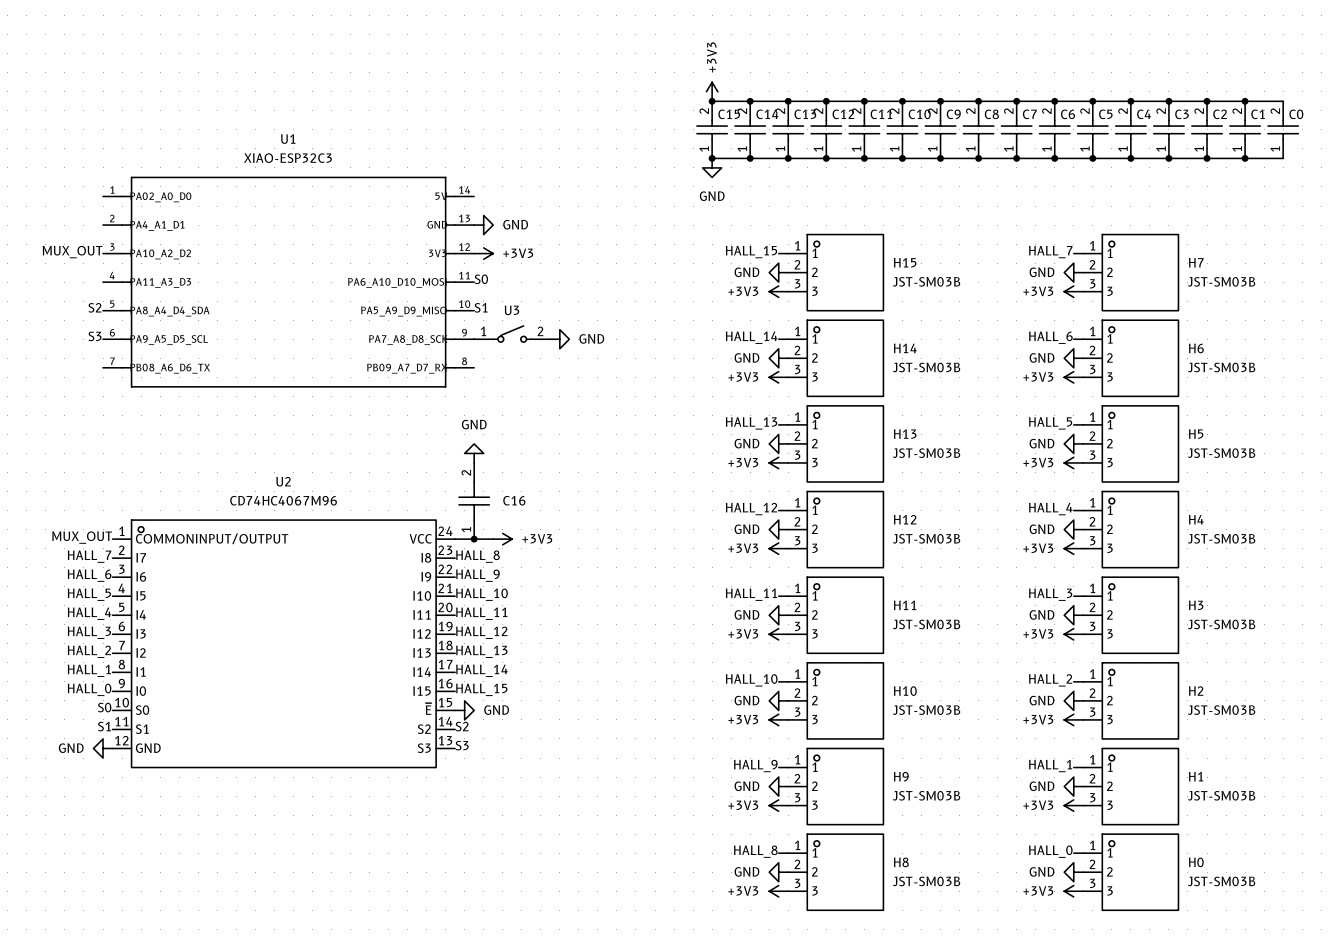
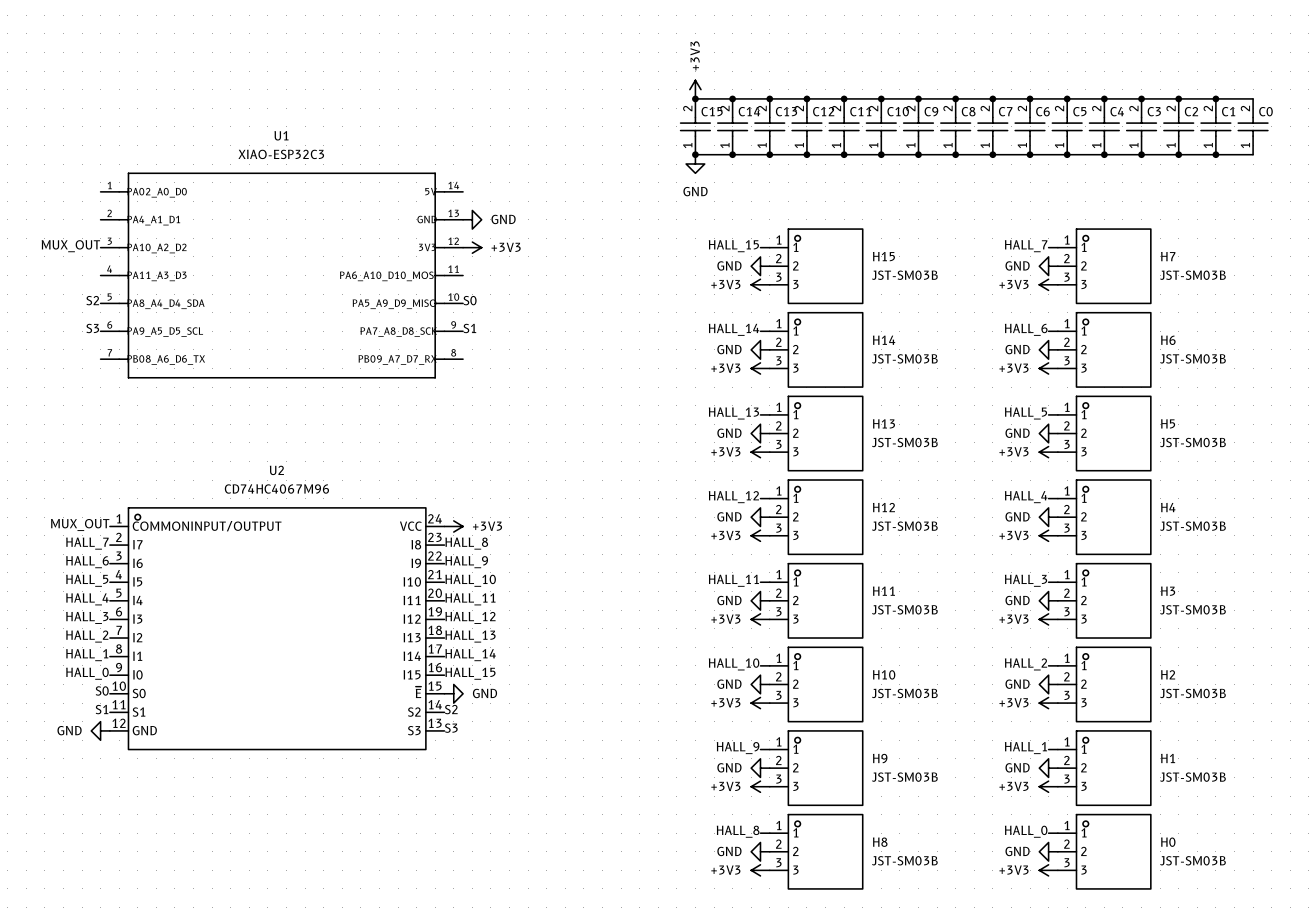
label: S0 (481, 279) -> none
label: S1 (481, 307) -> S0 (470, 300)
U3: (512, 334) -> none
label: none -> S1 (469, 328)
power symbol: GND (559, 339) -> none
power symbol: GND (474, 453) -> none
C16: (474, 501) -> none
junction: (474, 539) -> none
power symbol position: +3V3 (502, 539) -> +3V3 (453, 526)

